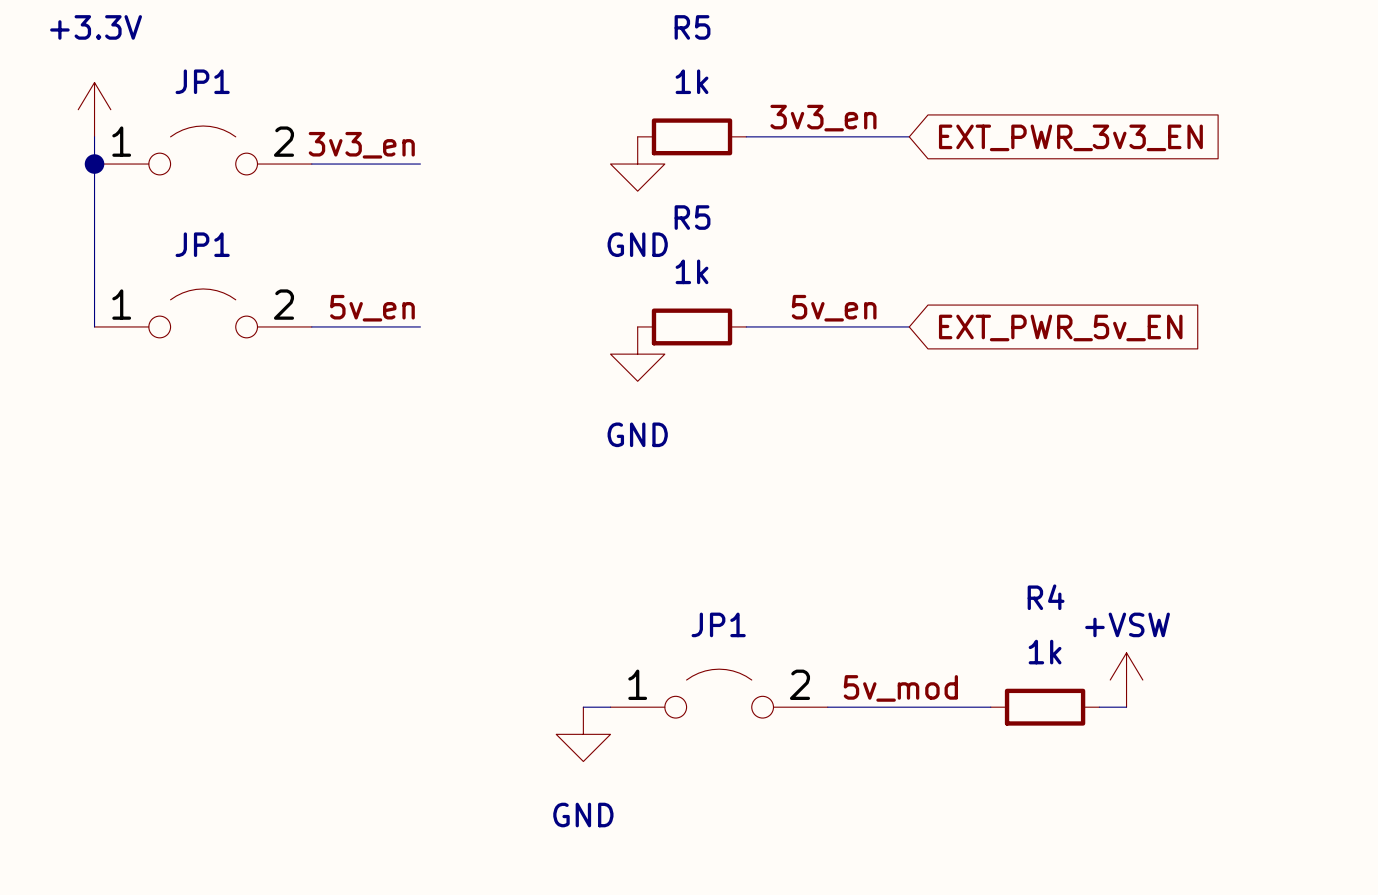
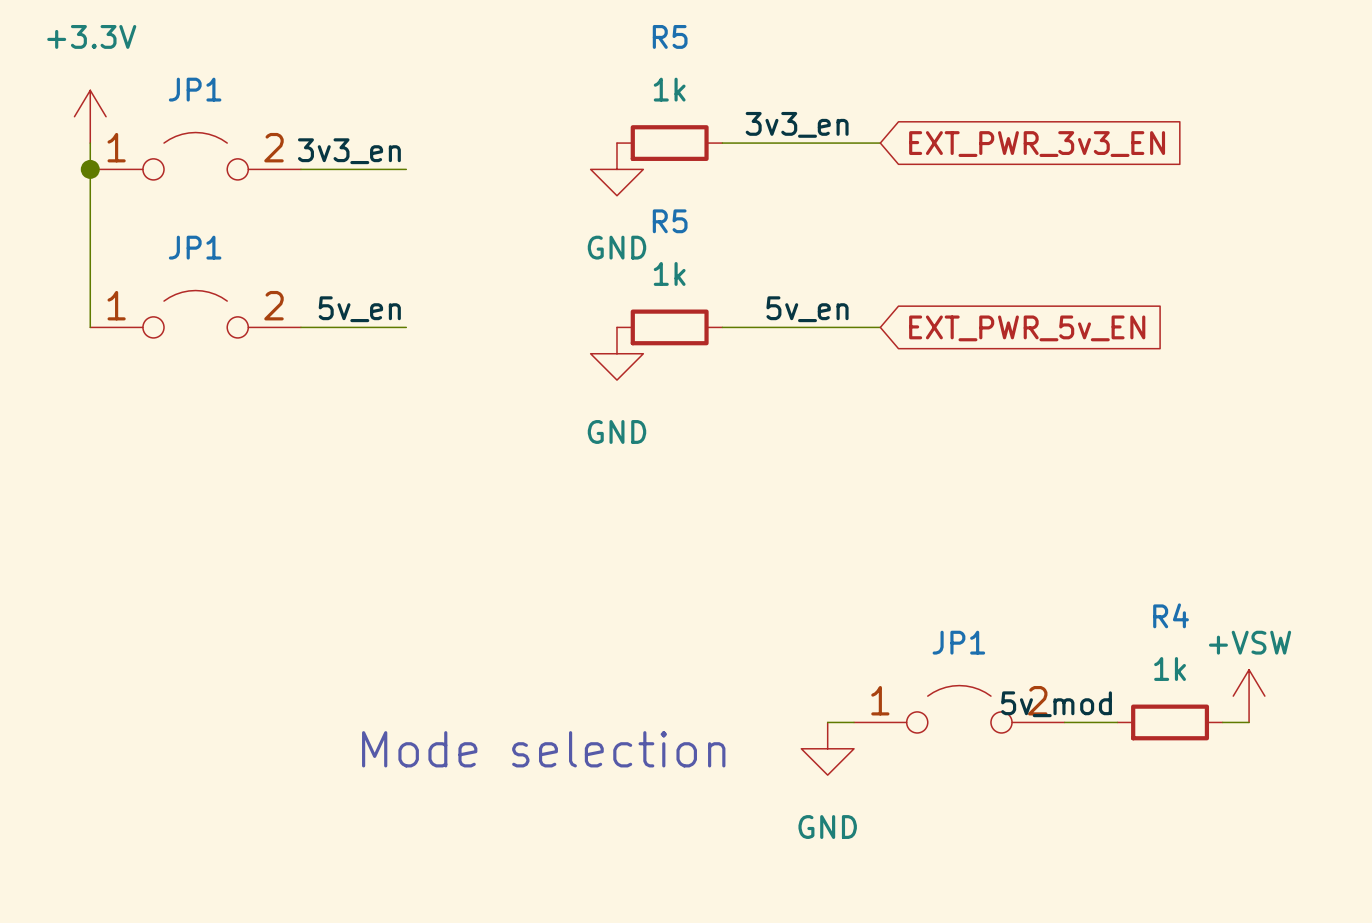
power symbol position: +VSW (1126, 680) -> +VSW (1249, 696)
label position: 5v_mod (900, 688) -> 5v_mod (1056, 704)
JP1 position: (719, 693) -> (959, 709)
wire: (583, 707) (610, 707) -> (827, 722) (854, 722)
wire: (827, 707) (990, 707) -> none
R4 position: (1045, 707) -> (1170, 722)
wire: (1099, 707) (1126, 707) -> (1222, 722) (1249, 722)
power symbol position: GND (583, 734) -> GND (827, 748)
wire: none -> (1064, 722) (1117, 722)
text: none -> Mode selection (543, 749)

